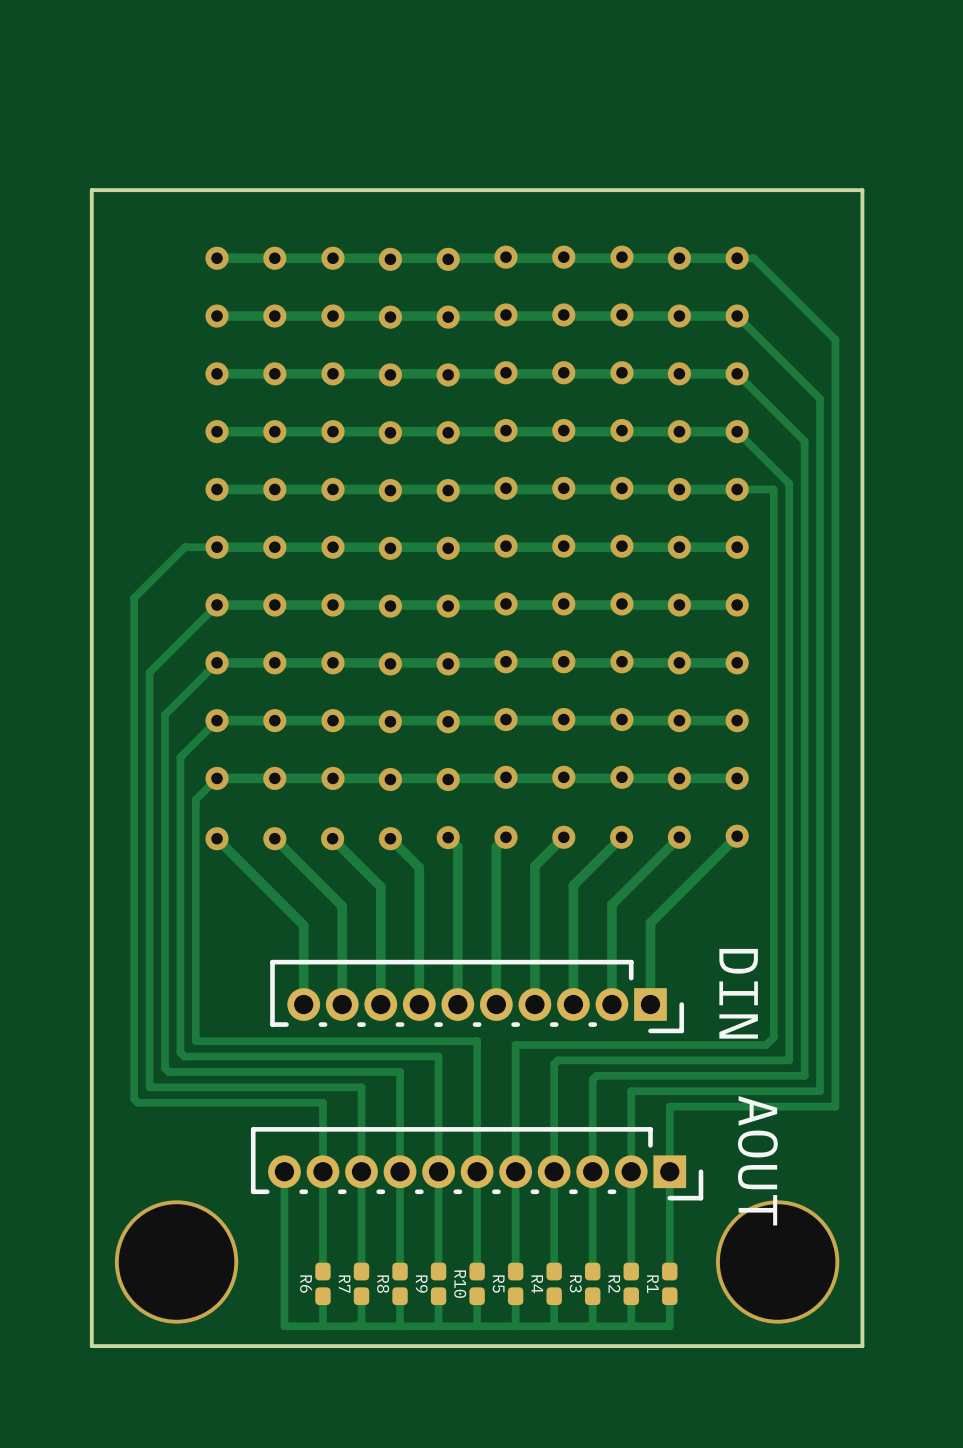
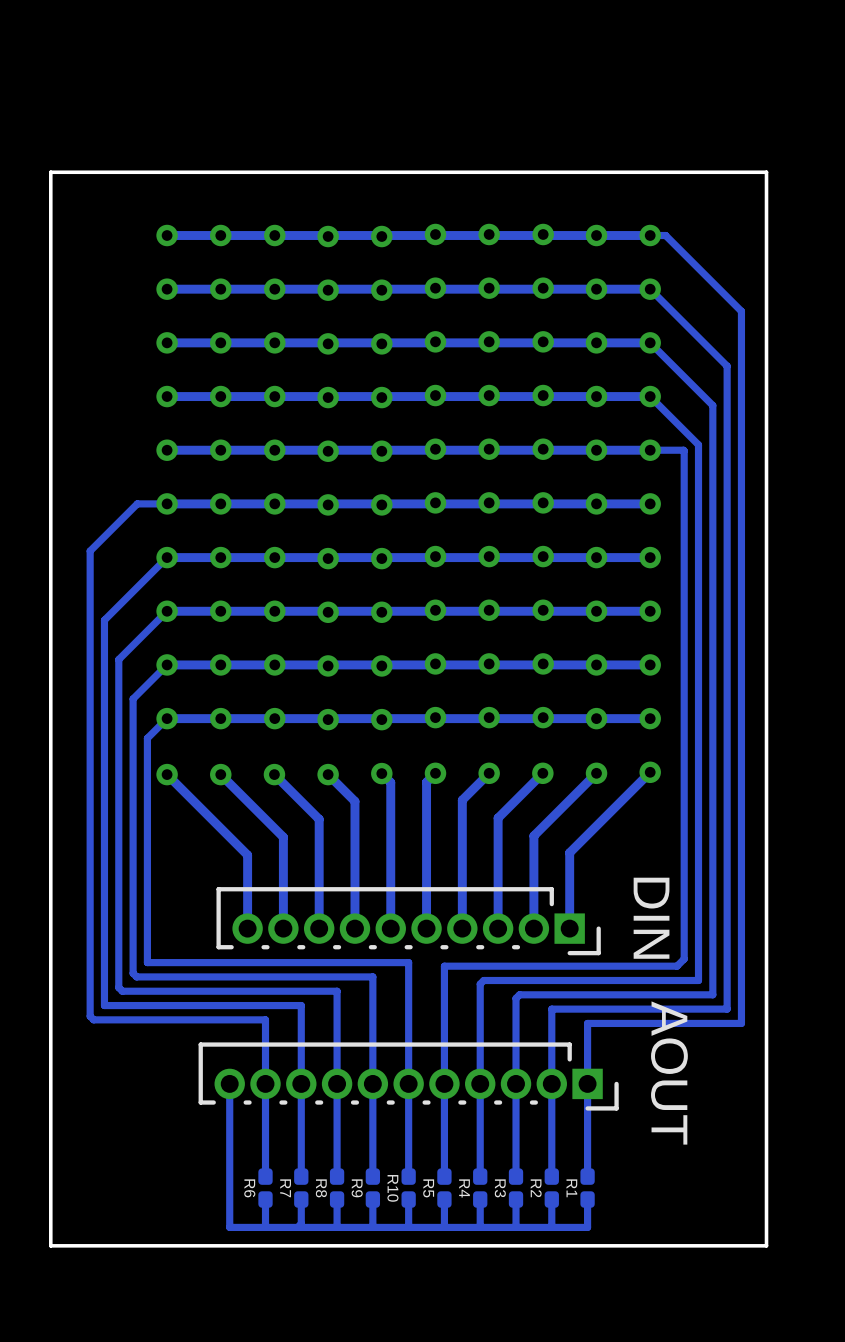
via: (176, 1261) -> none
via: (777, 1261) -> none

